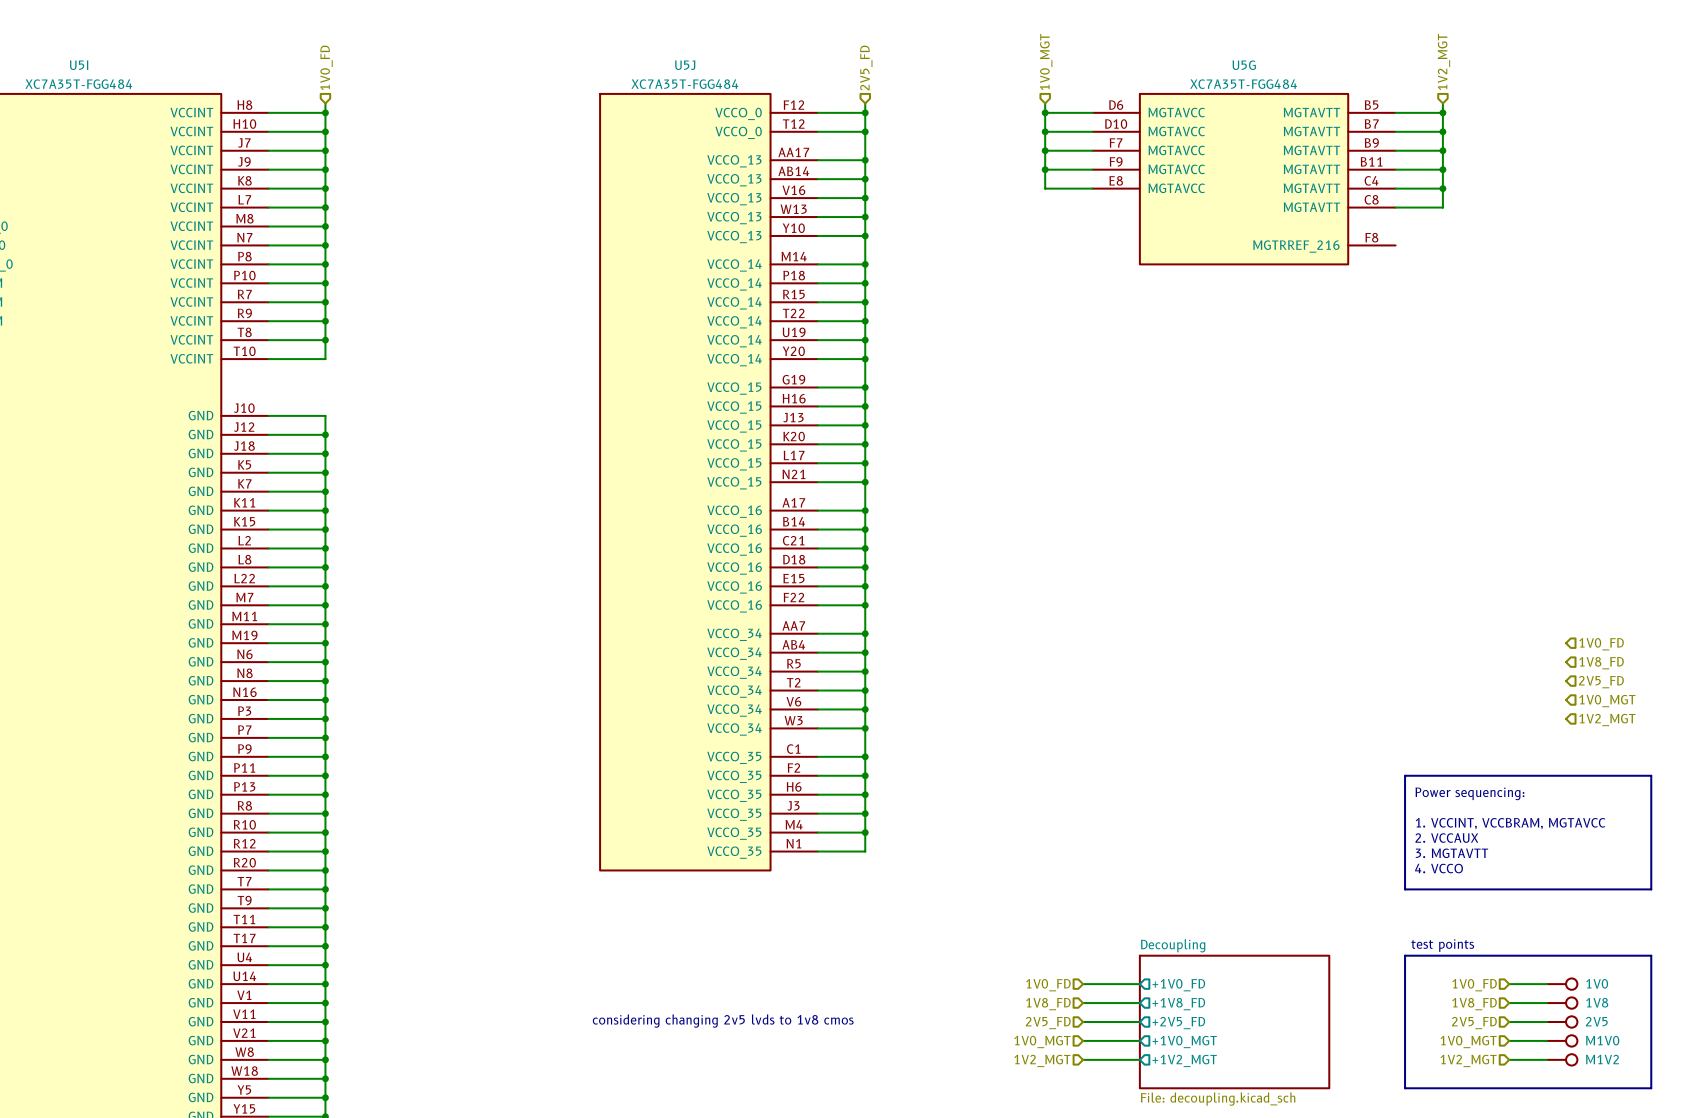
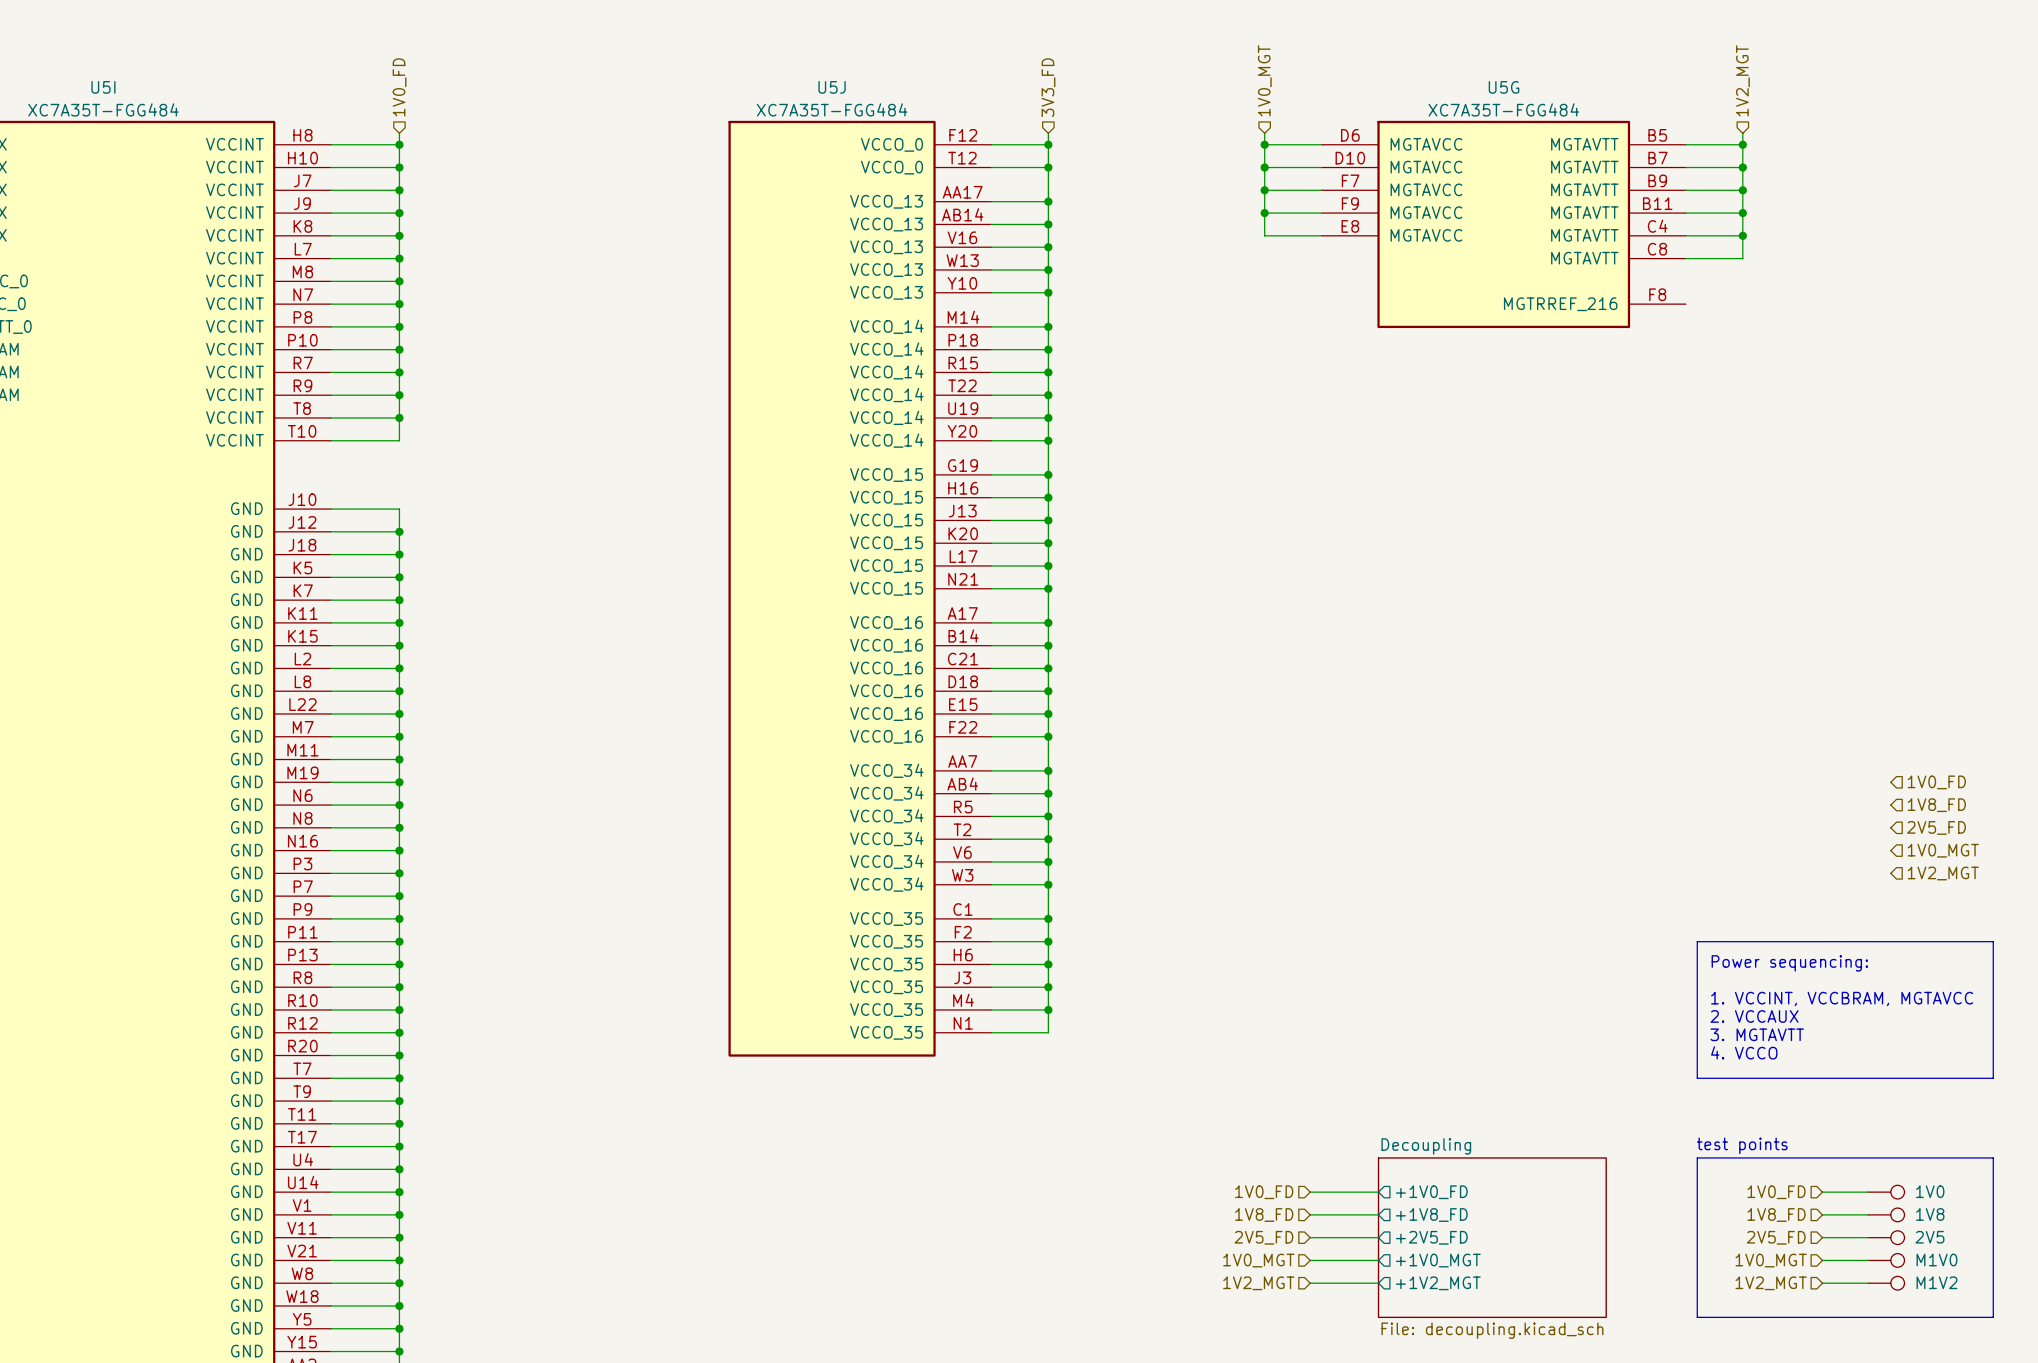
hierarchical label: 2V5_FD (866, 68) -> 3V3_FD (1048, 87)
text: considering changing 2v5 lvds to 1v8 cmos (723, 1021) -> none

